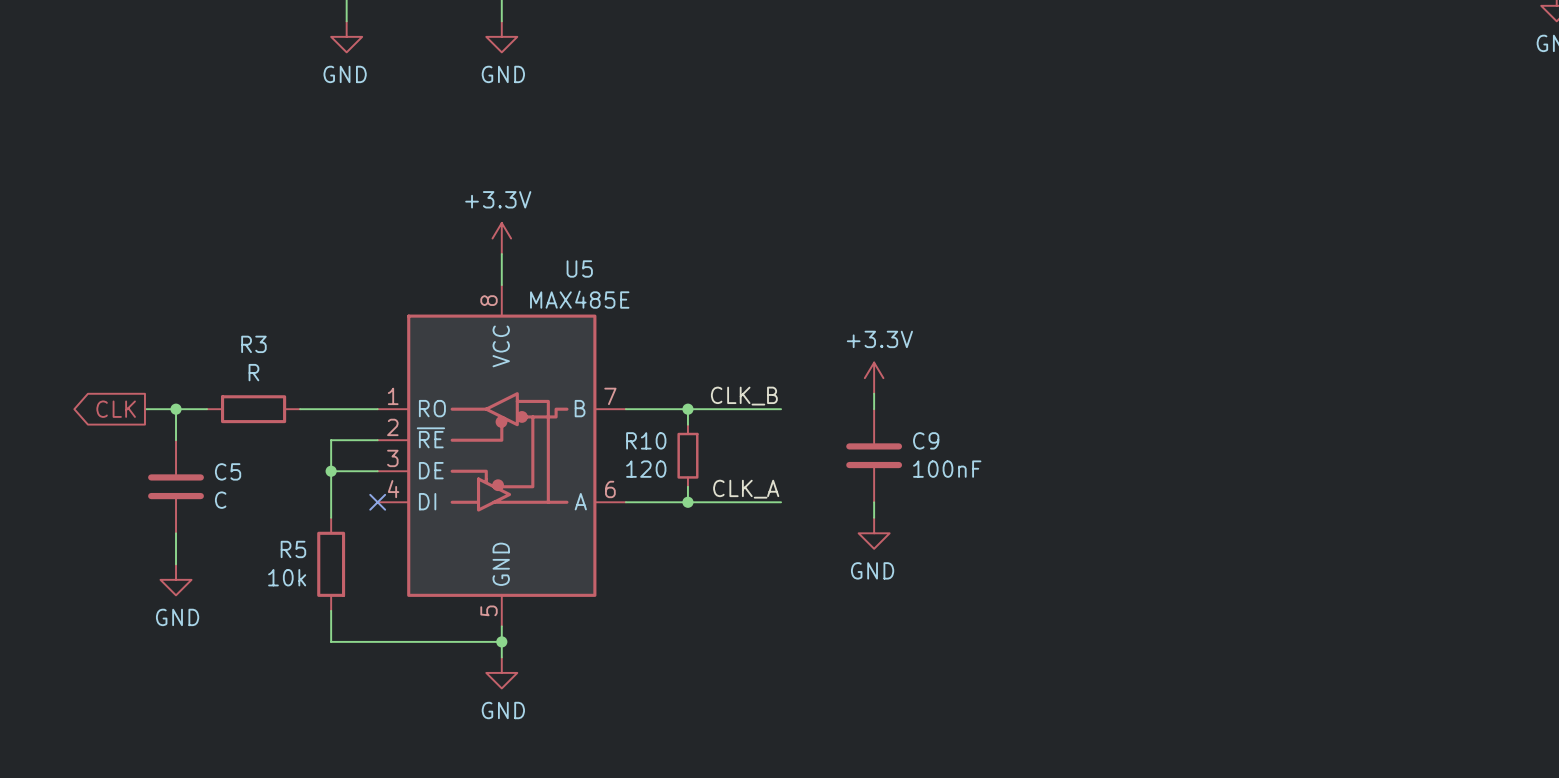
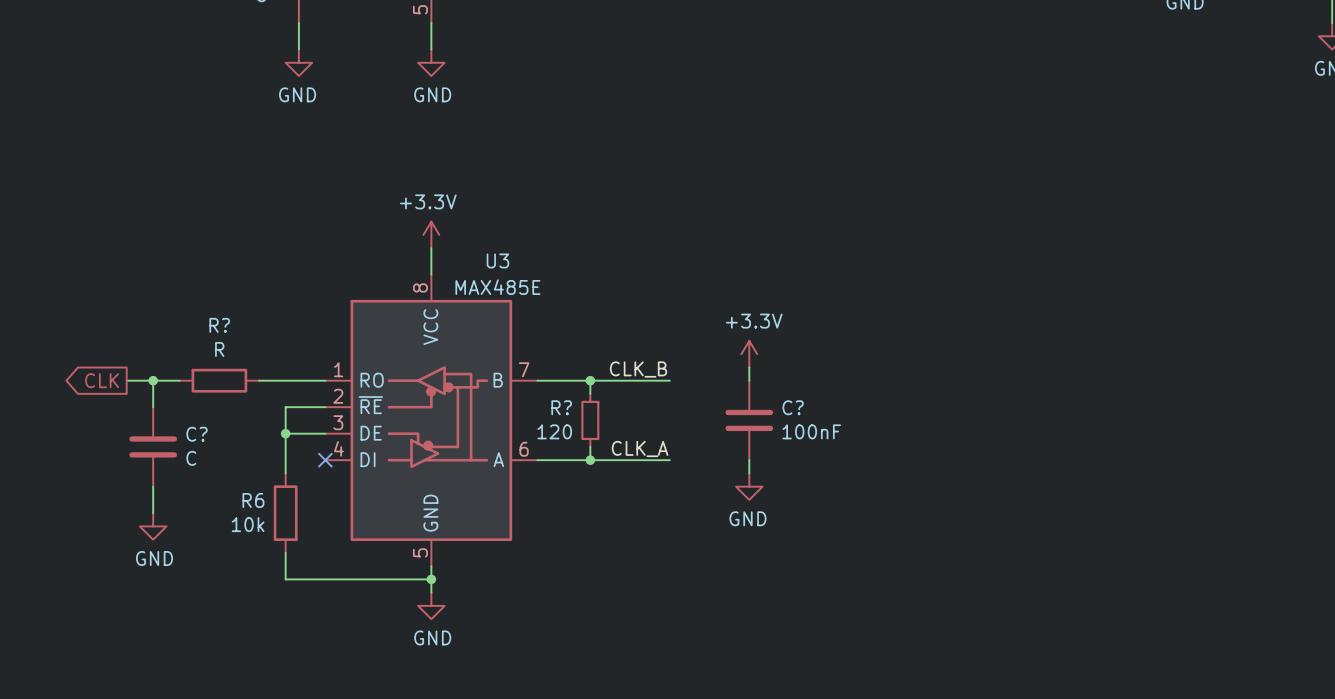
U5 name: U5 (579, 268) -> U3 (497, 260)
R3 name: R3 (253, 344) -> R? (219, 325)
R10 name: R10 (646, 440) -> R? (561, 407)
C9 name: C9 (926, 440) -> C? (793, 407)
C5 name: C5 (228, 471) -> C? (197, 434)
R5 name: R5 (293, 549) -> R6 (253, 500)

